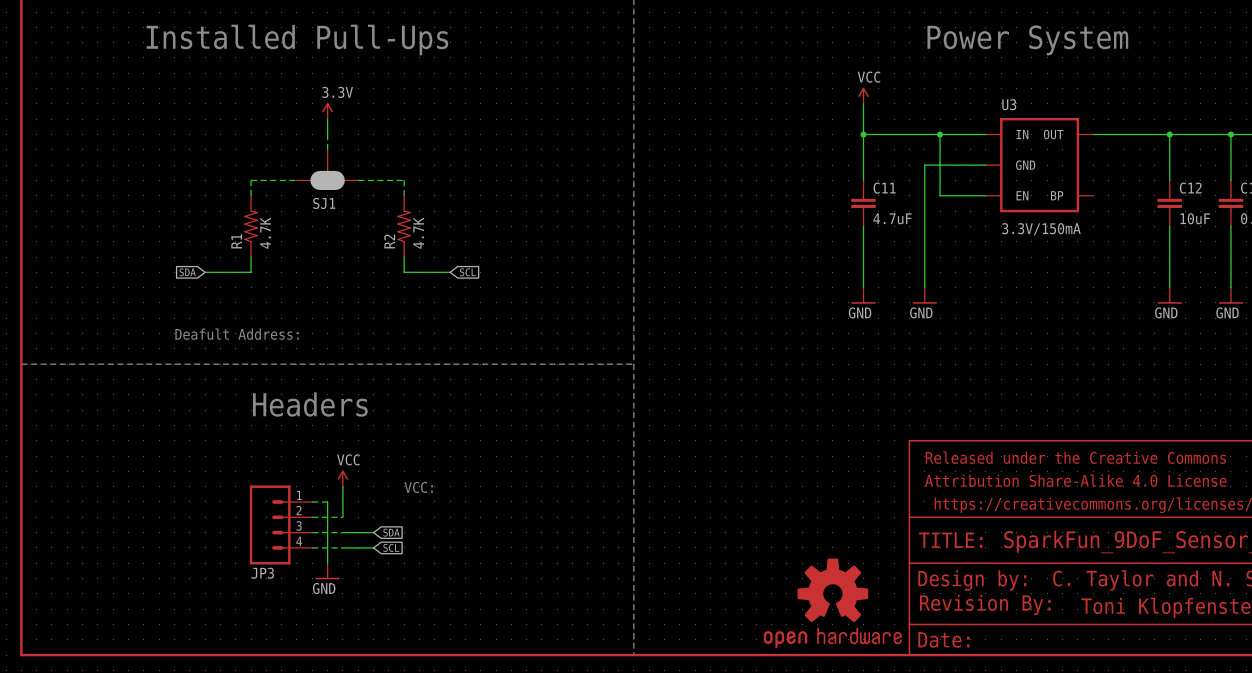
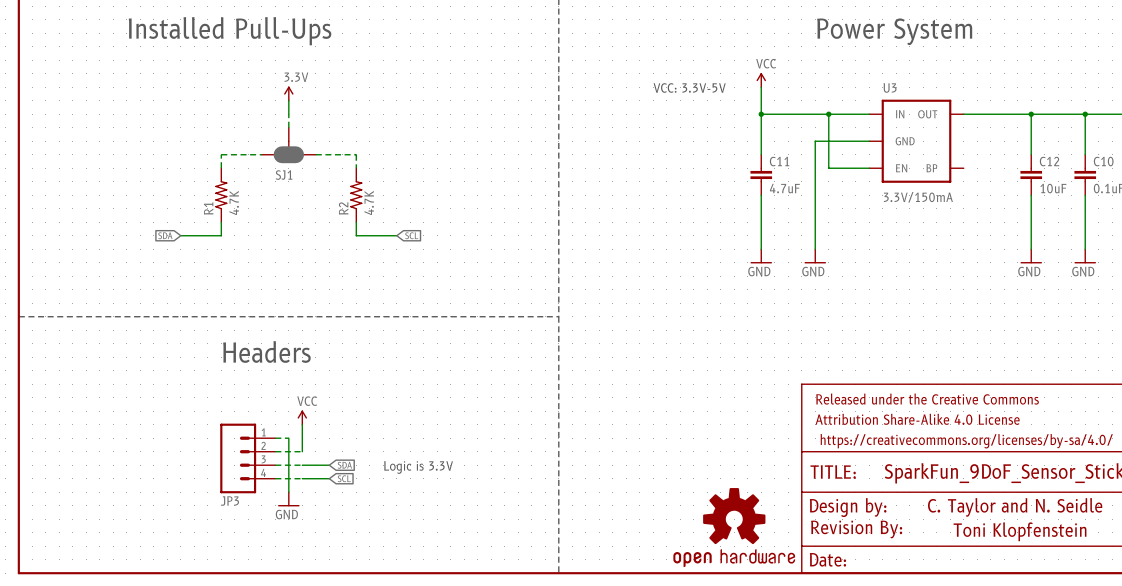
text: none -> VCC: 3.3V-5V (689, 87)
text: Deafult Address: (237, 334) -> none
text: VCC: (418, 487) -> none
text: none -> Logic is 3.3V (418, 467)

